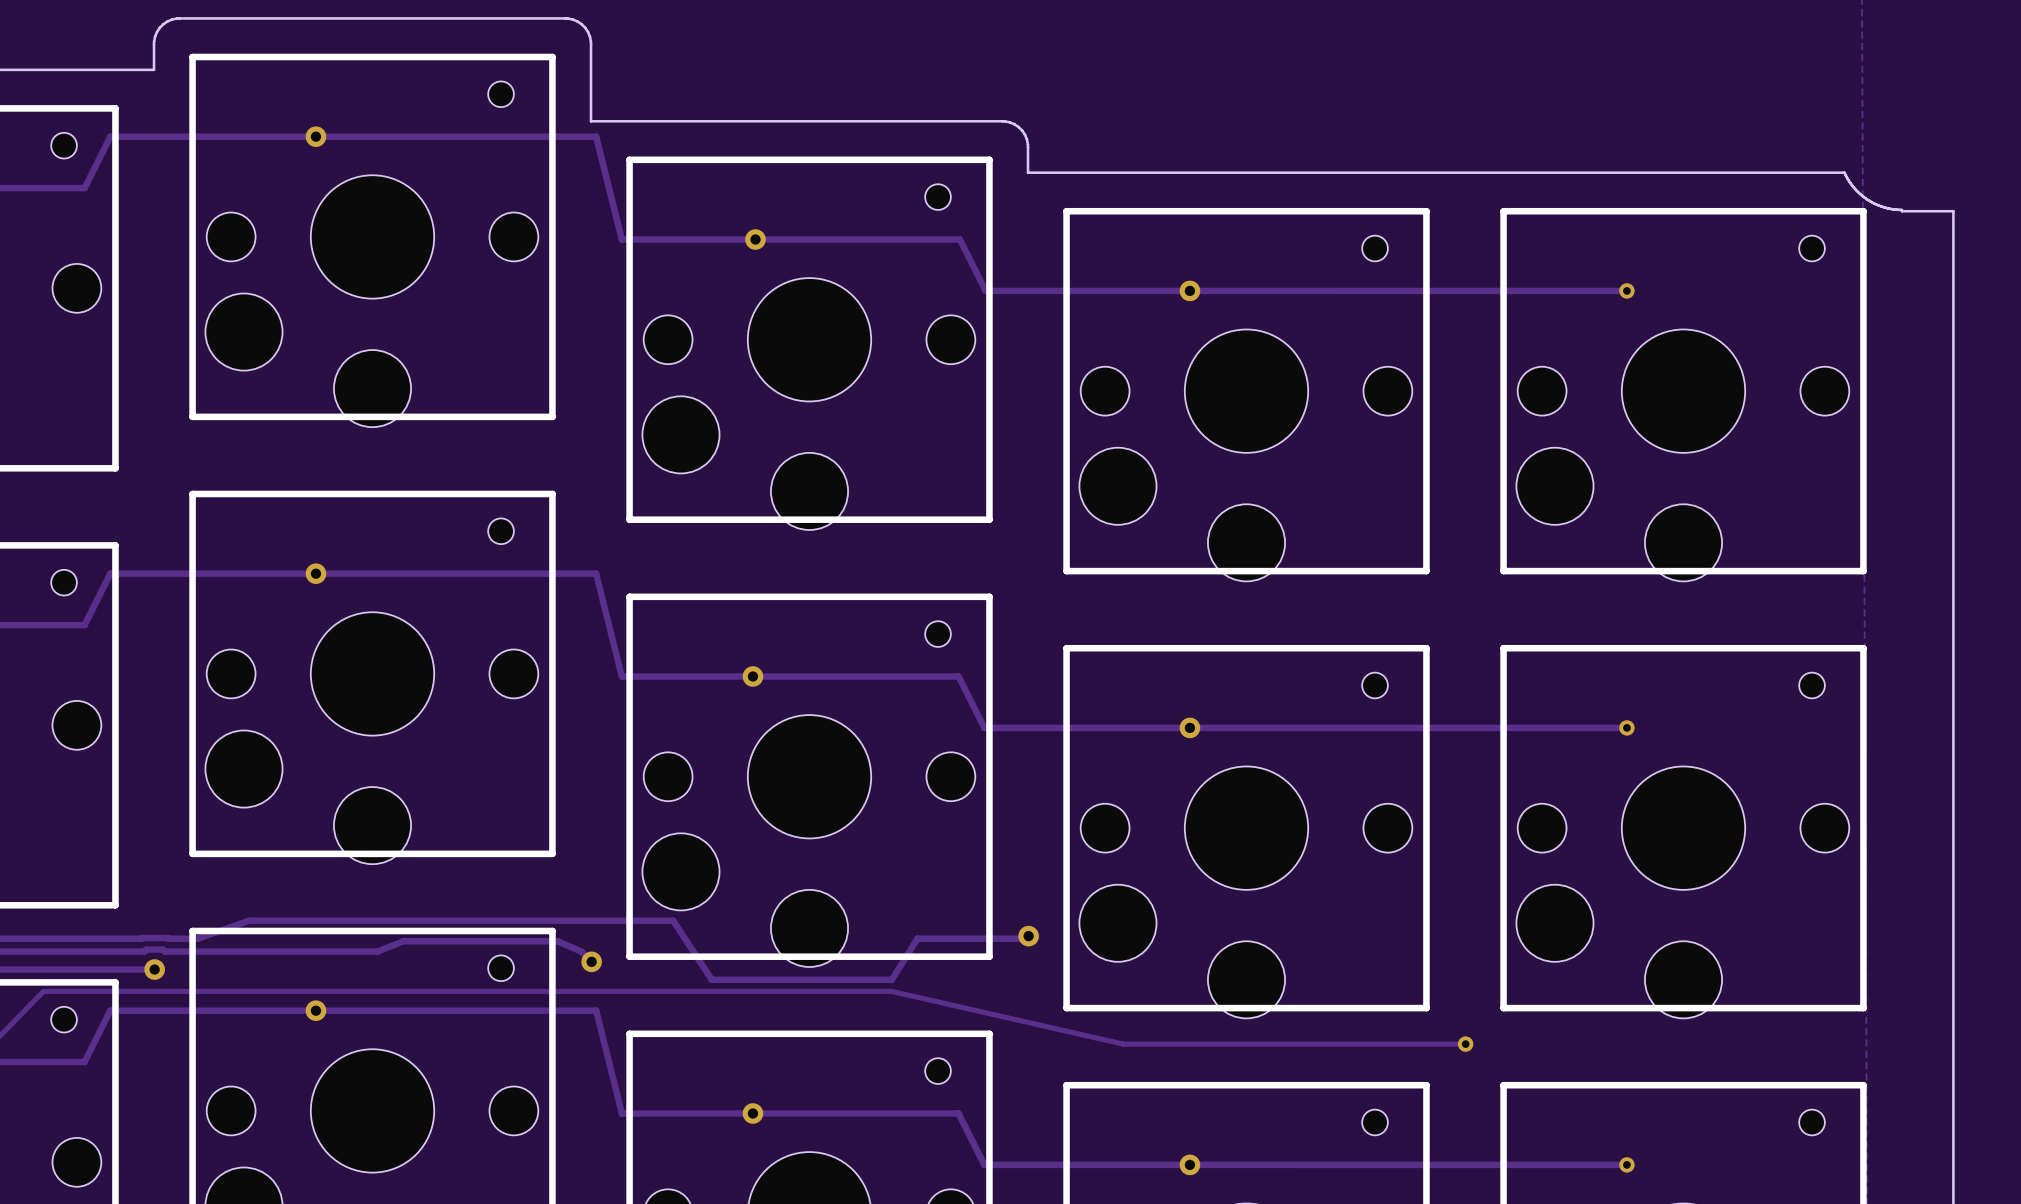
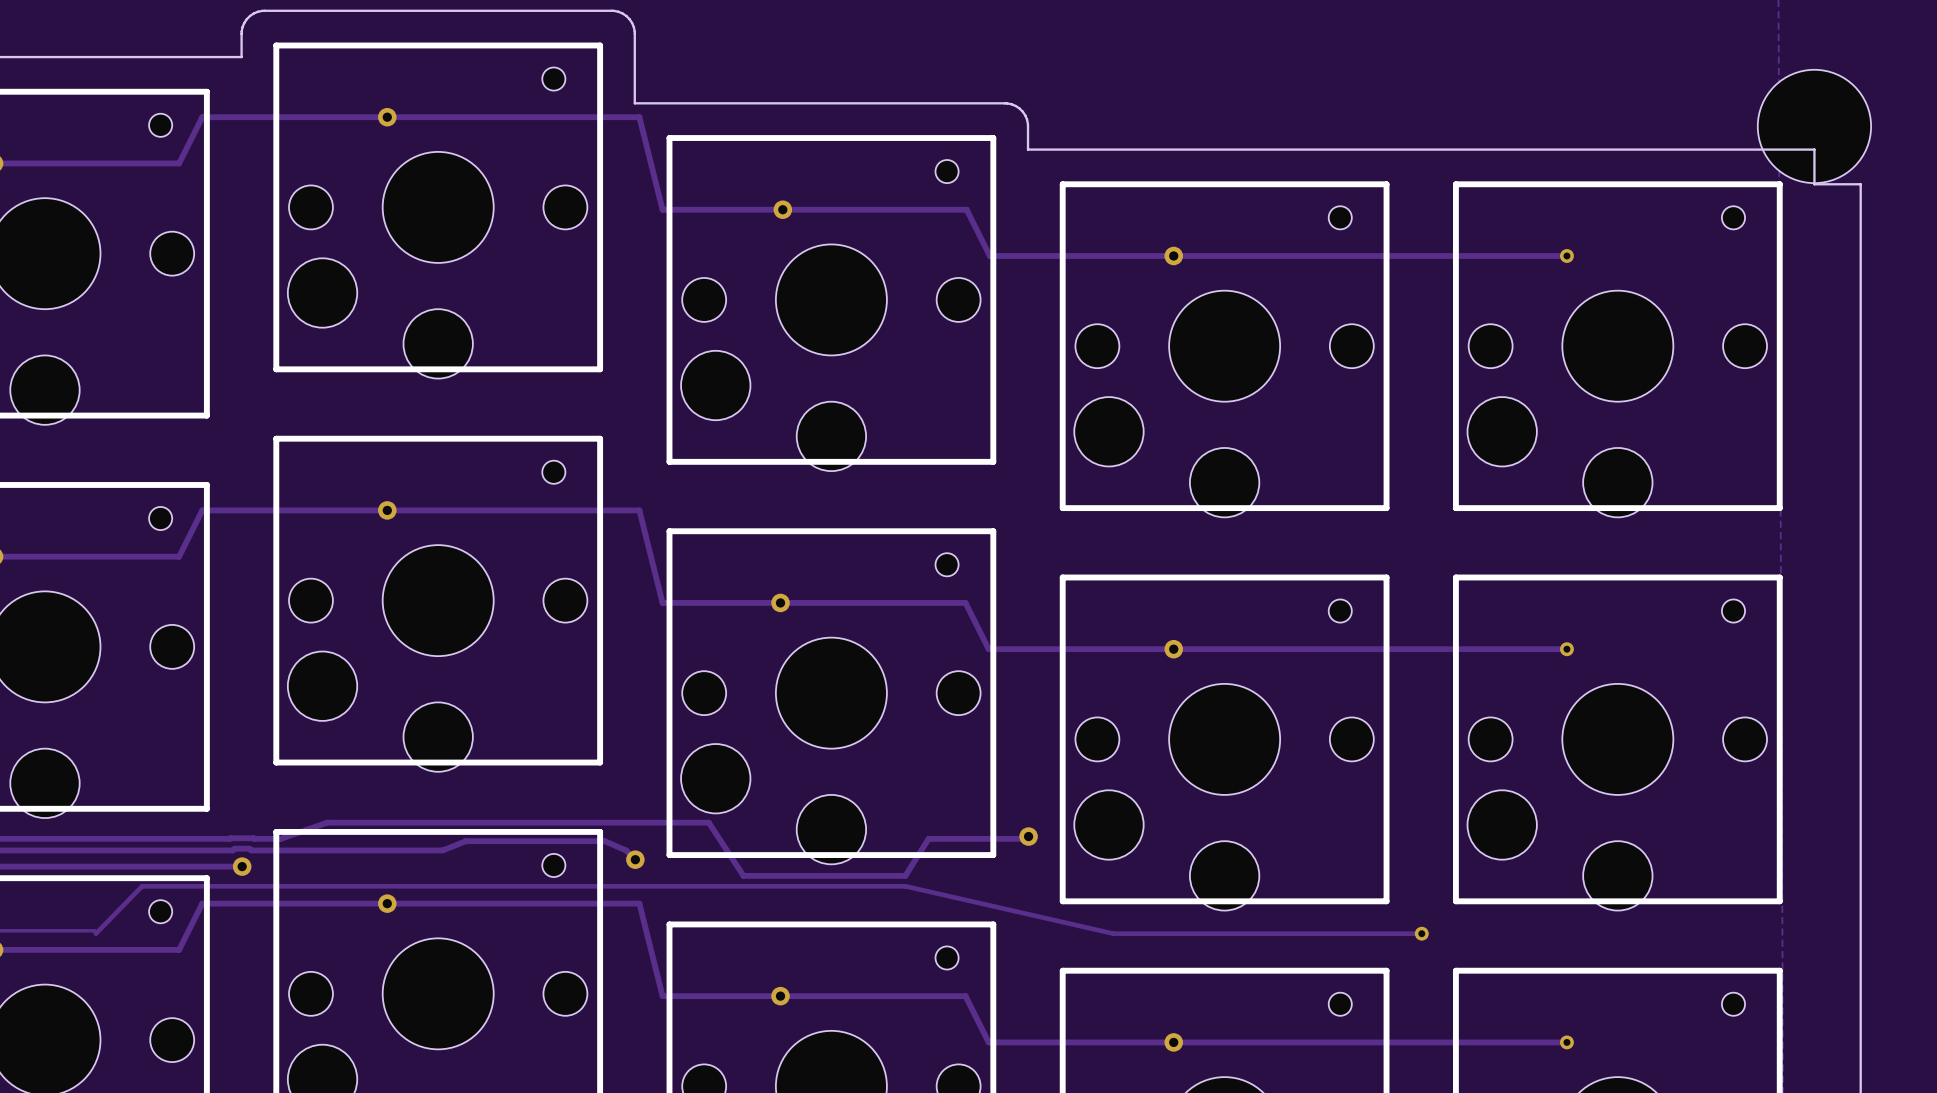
part: none -> (1814, 126)
board edge: (1844, 172) (1854, 188) (1868, 200) (1883, 207) (1901, 209) -> (1762, 149) (1814, 149) (1814, 183)

